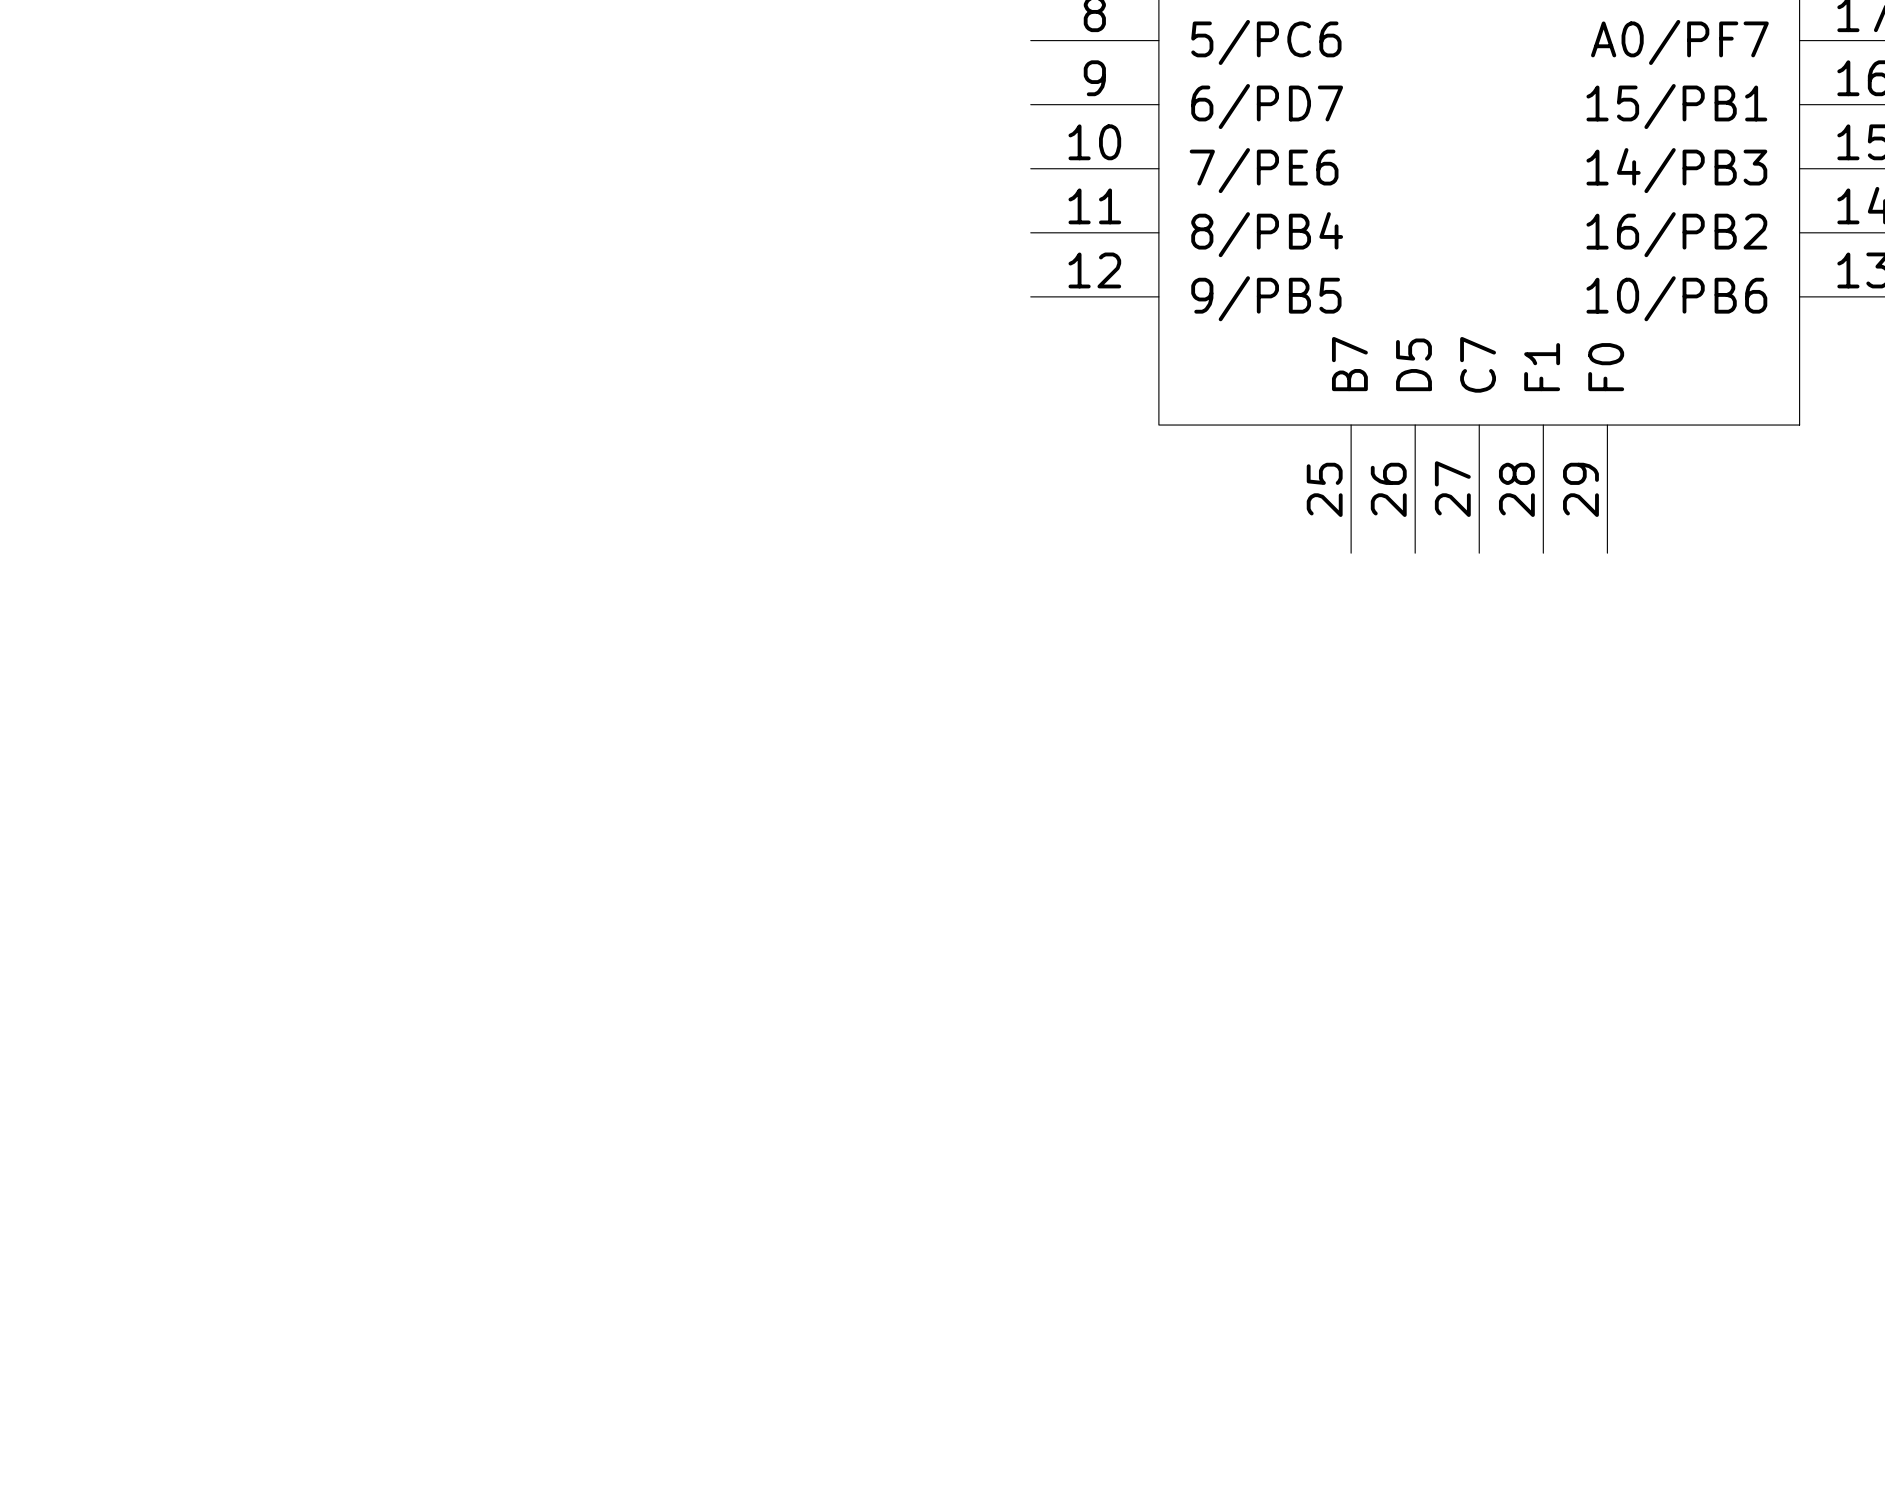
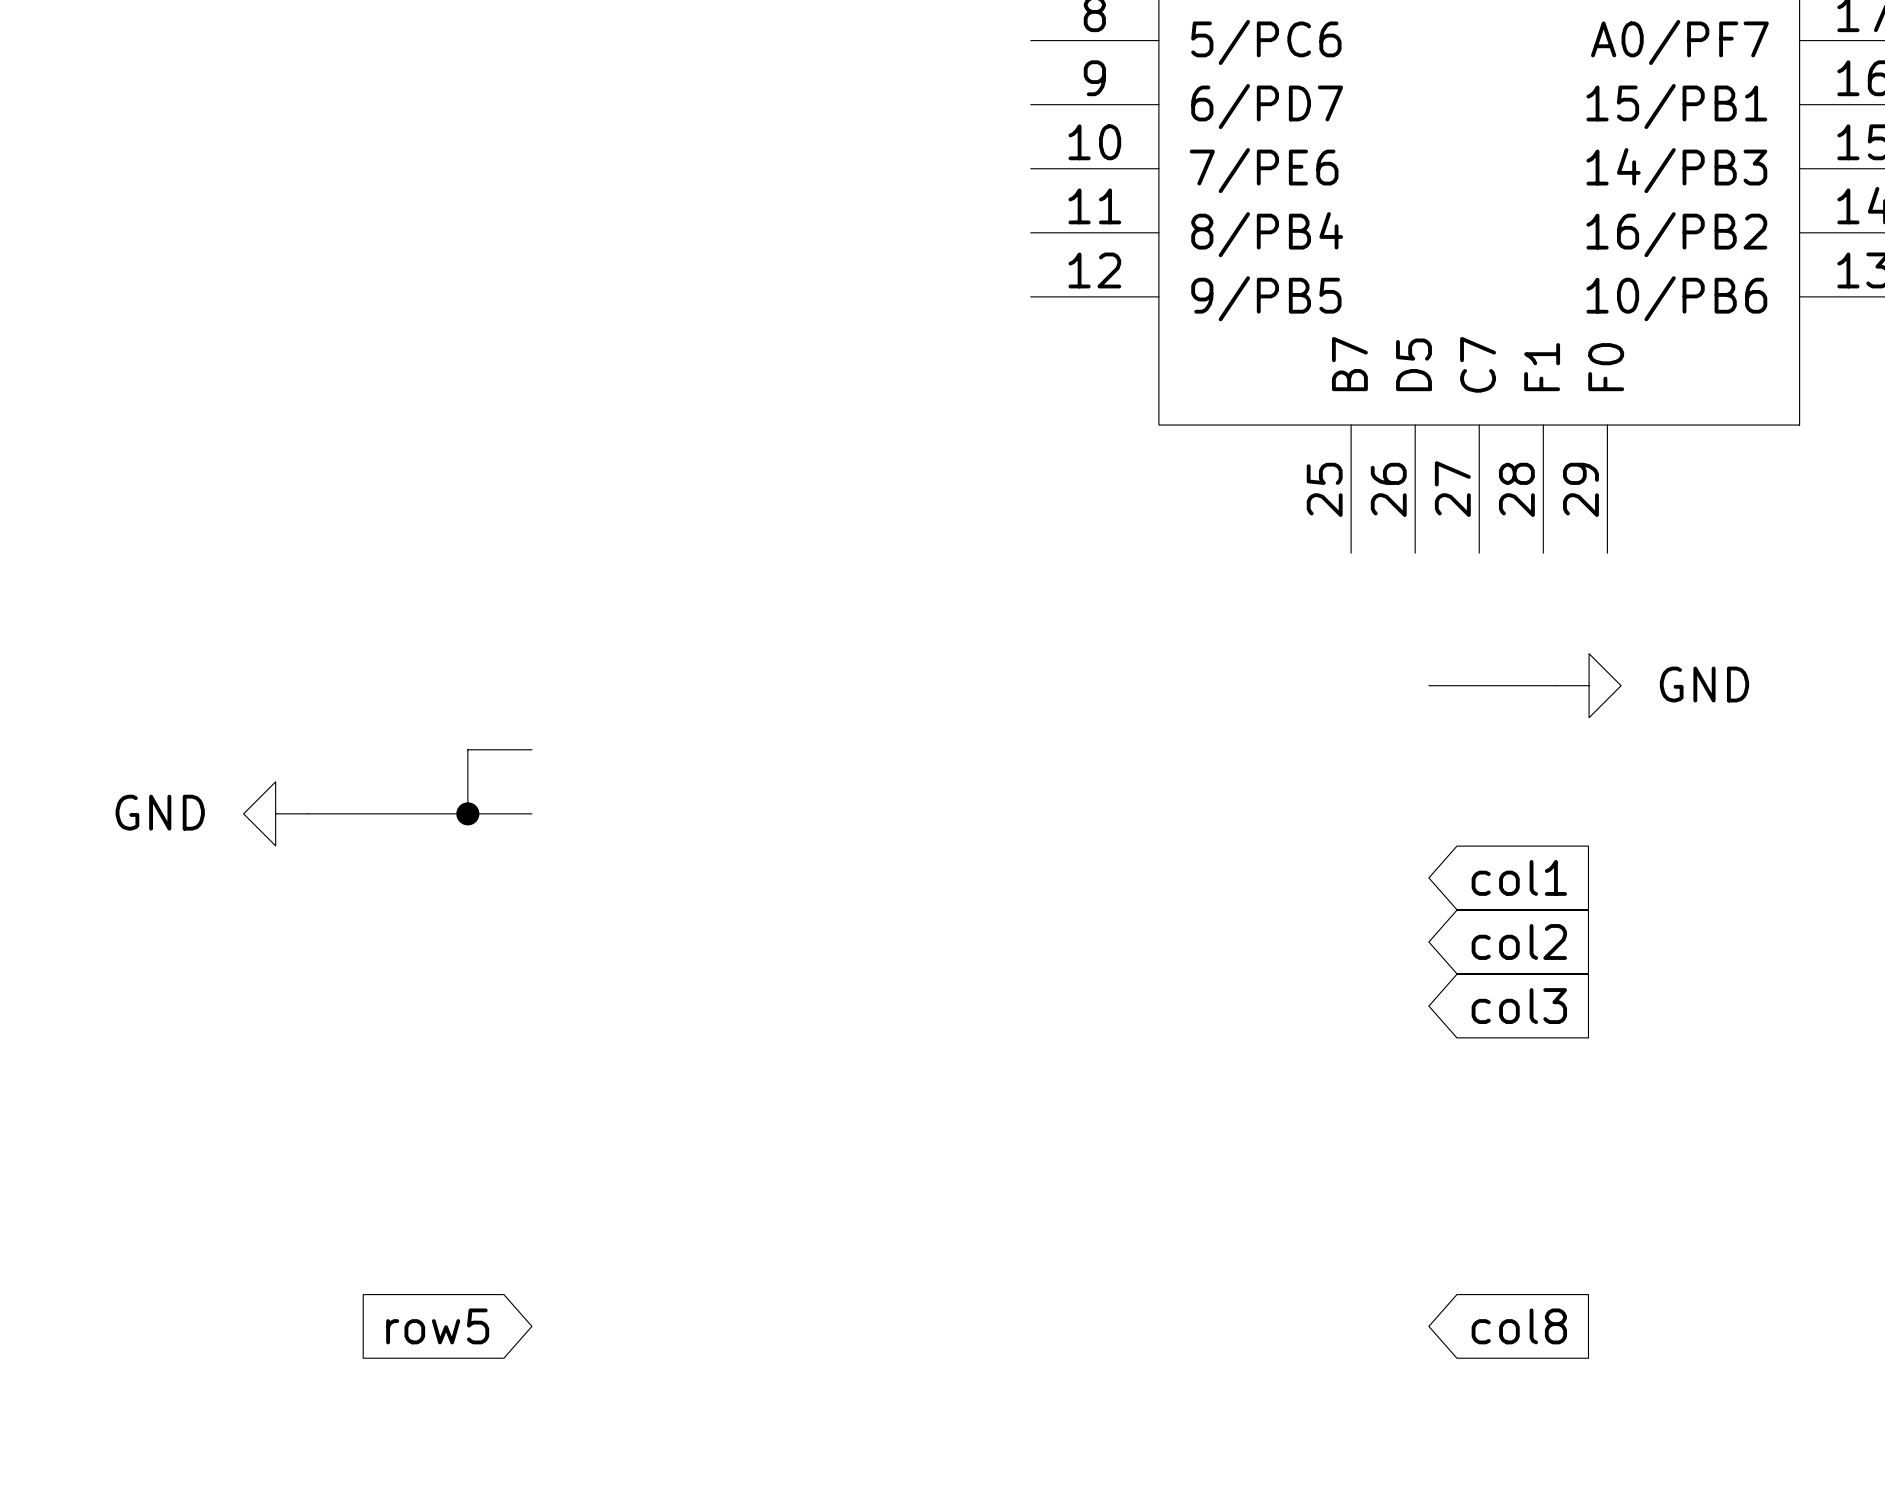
wire: none -> (1428, 685) (1557, 685)
power symbol: none -> GND (1589, 685)
wire: none -> (531, 749) (467, 749) (467, 813)
power symbol: none -> GND (275, 813)
wire: none -> (307, 813) (531, 813)
junction: none -> (467, 813)
global label: none -> col1 (1519, 877)
global label: none -> col2 (1519, 941)
global label: none -> col3 (1519, 1006)
global label: none -> row5 (437, 1326)
global label: none -> col8 (1519, 1326)

